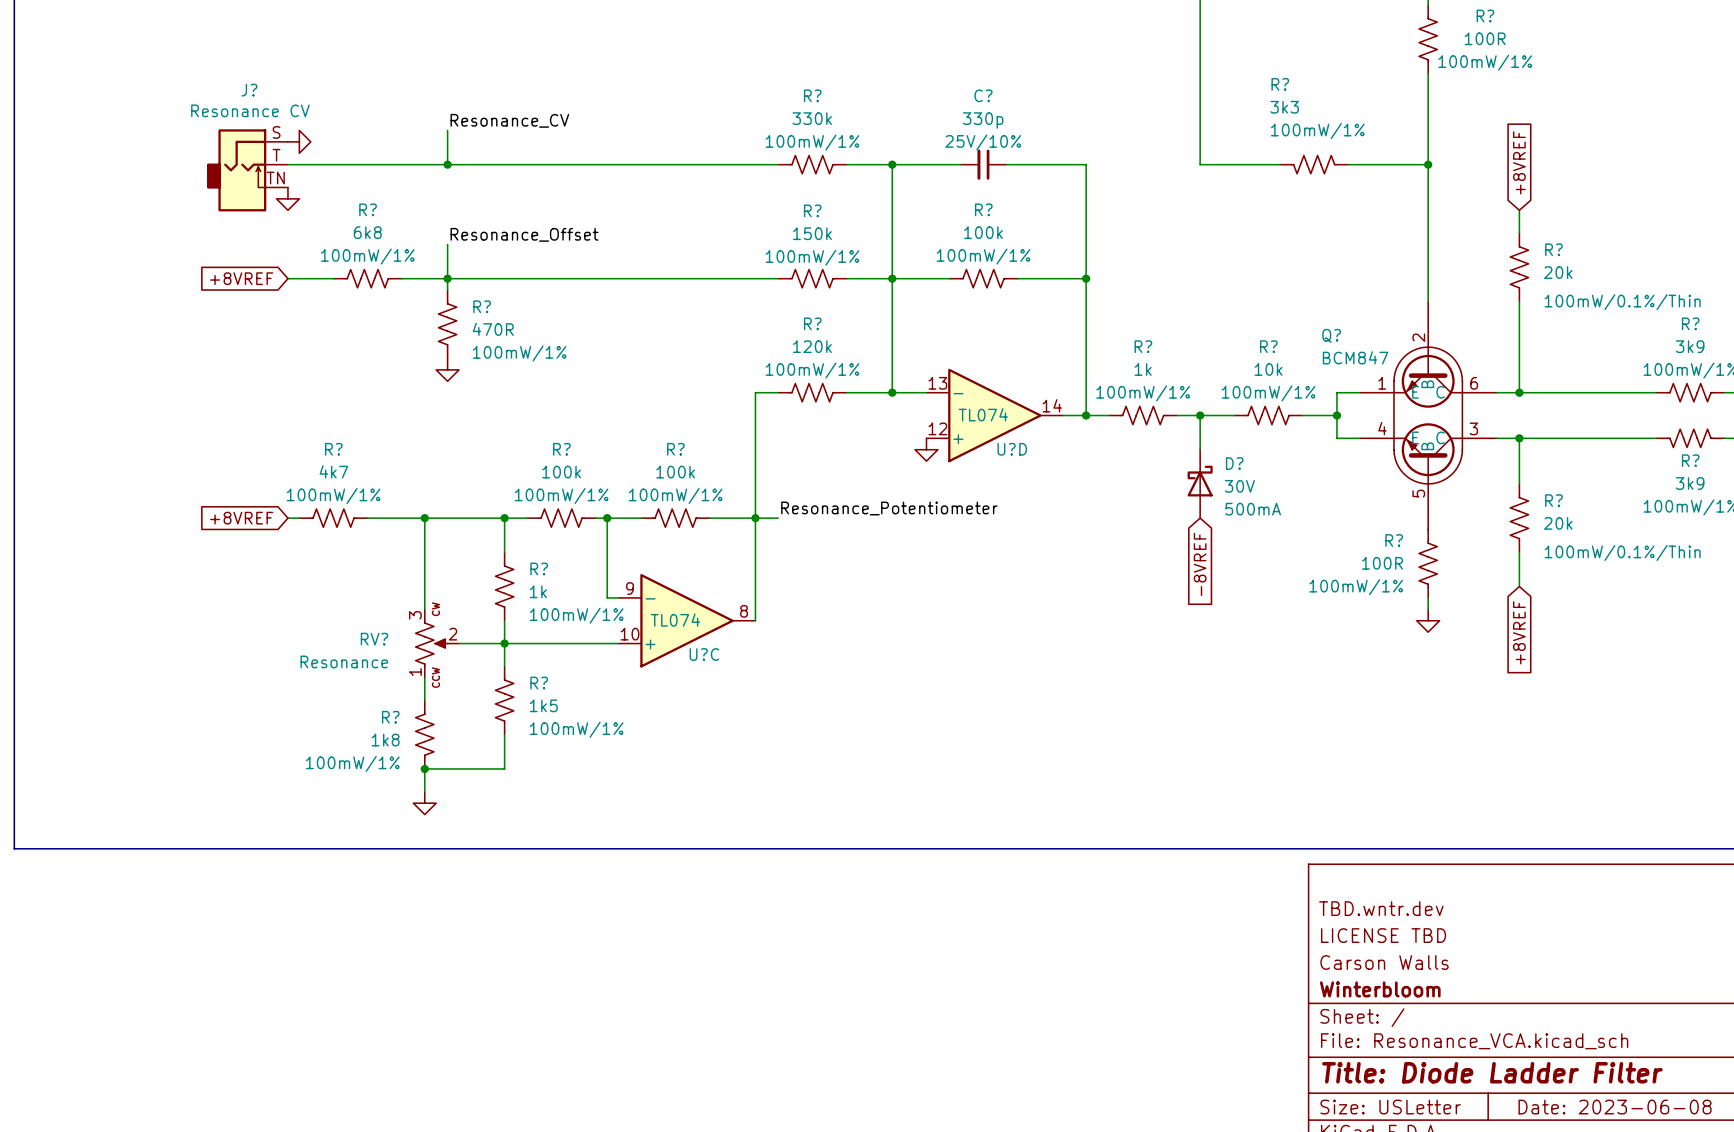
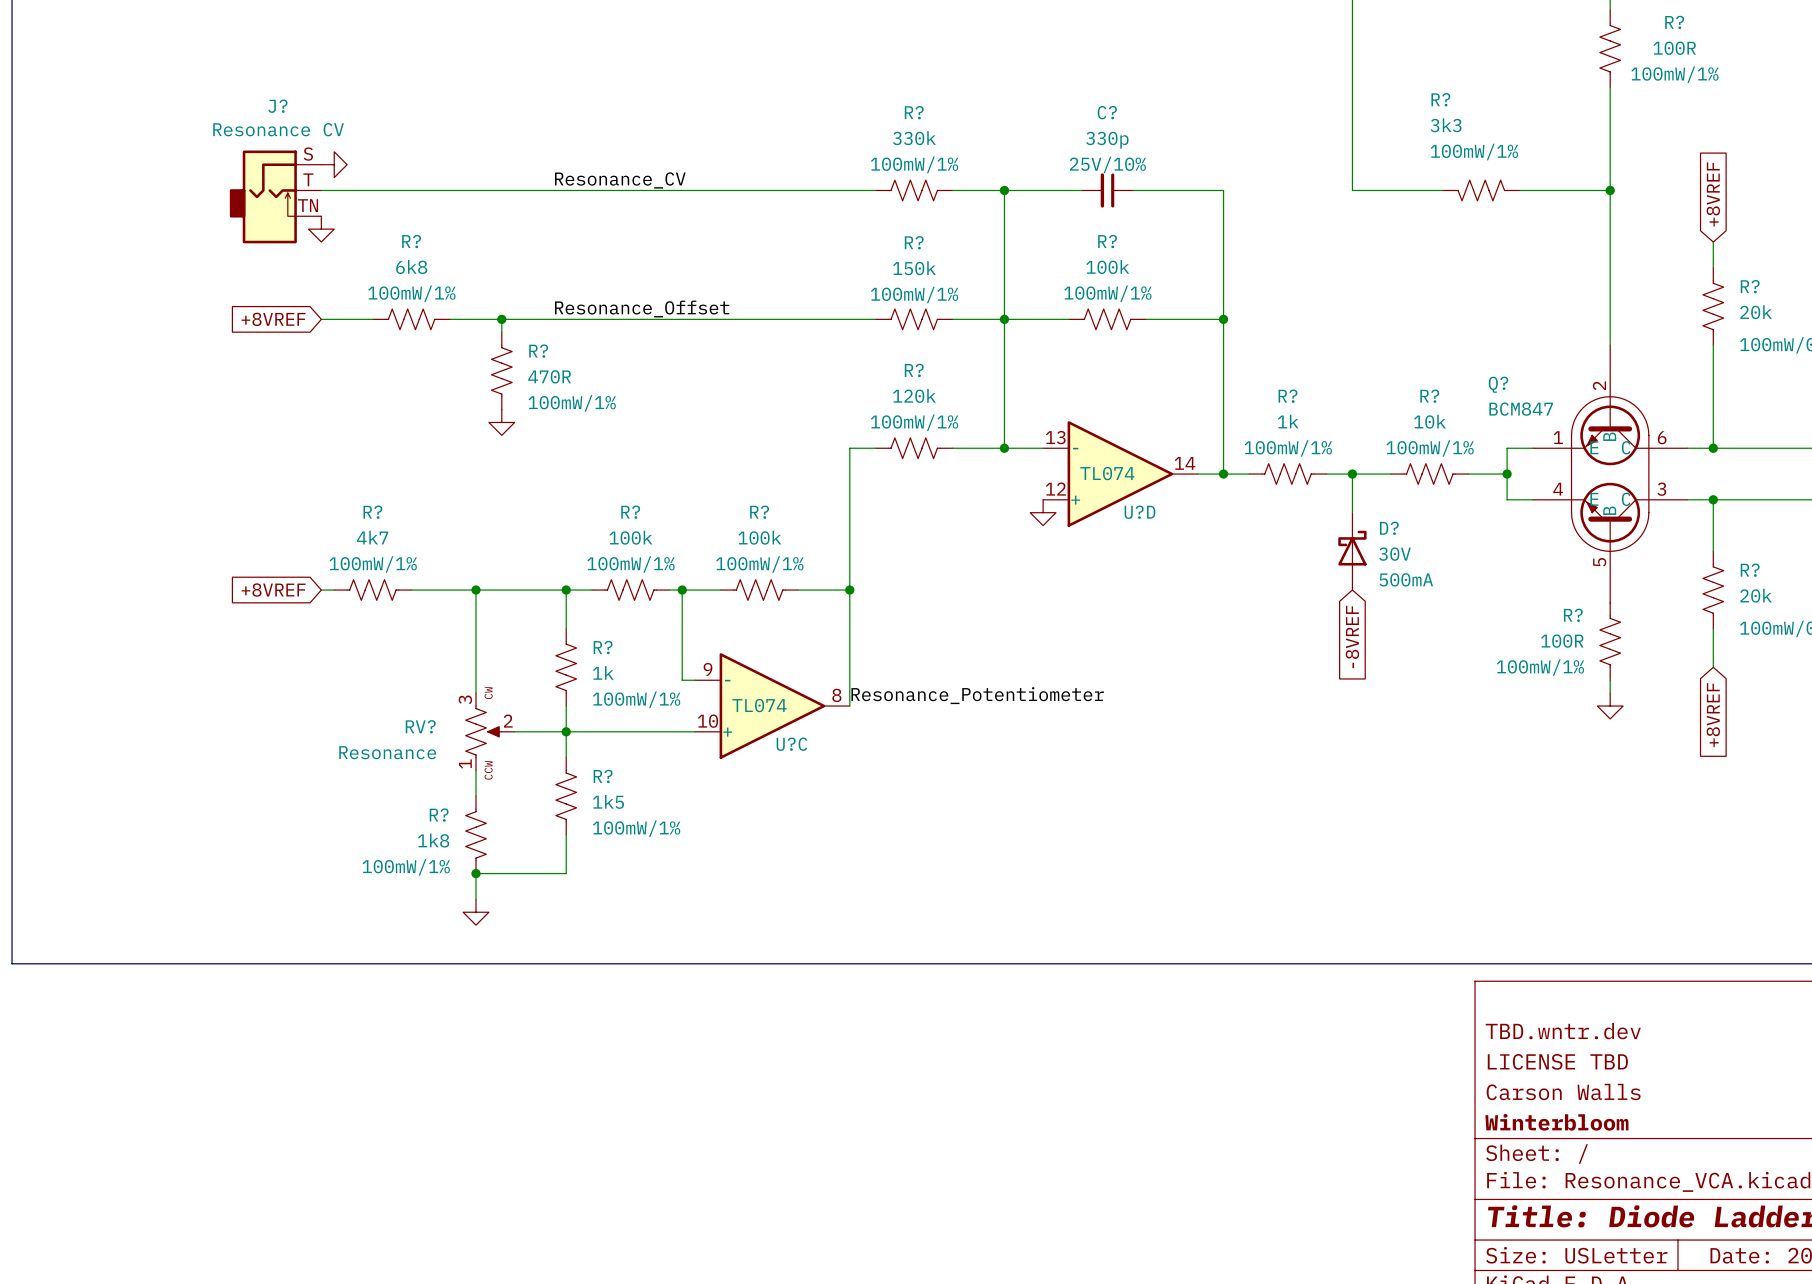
label position: Resonance_CV (509, 120) -> Resonance_CV (620, 180)
wire: (447, 130) (447, 164) -> none
junction: (447, 164) -> none
label position: Resonance_Offset (524, 234) -> Resonance_Offset (642, 309)
wire: (447, 244) (447, 278) -> none
label position: Resonance_Potentiometer (889, 508) -> Resonance_Potentiometer (977, 695)
wire: (755, 518) (778, 518) -> none

